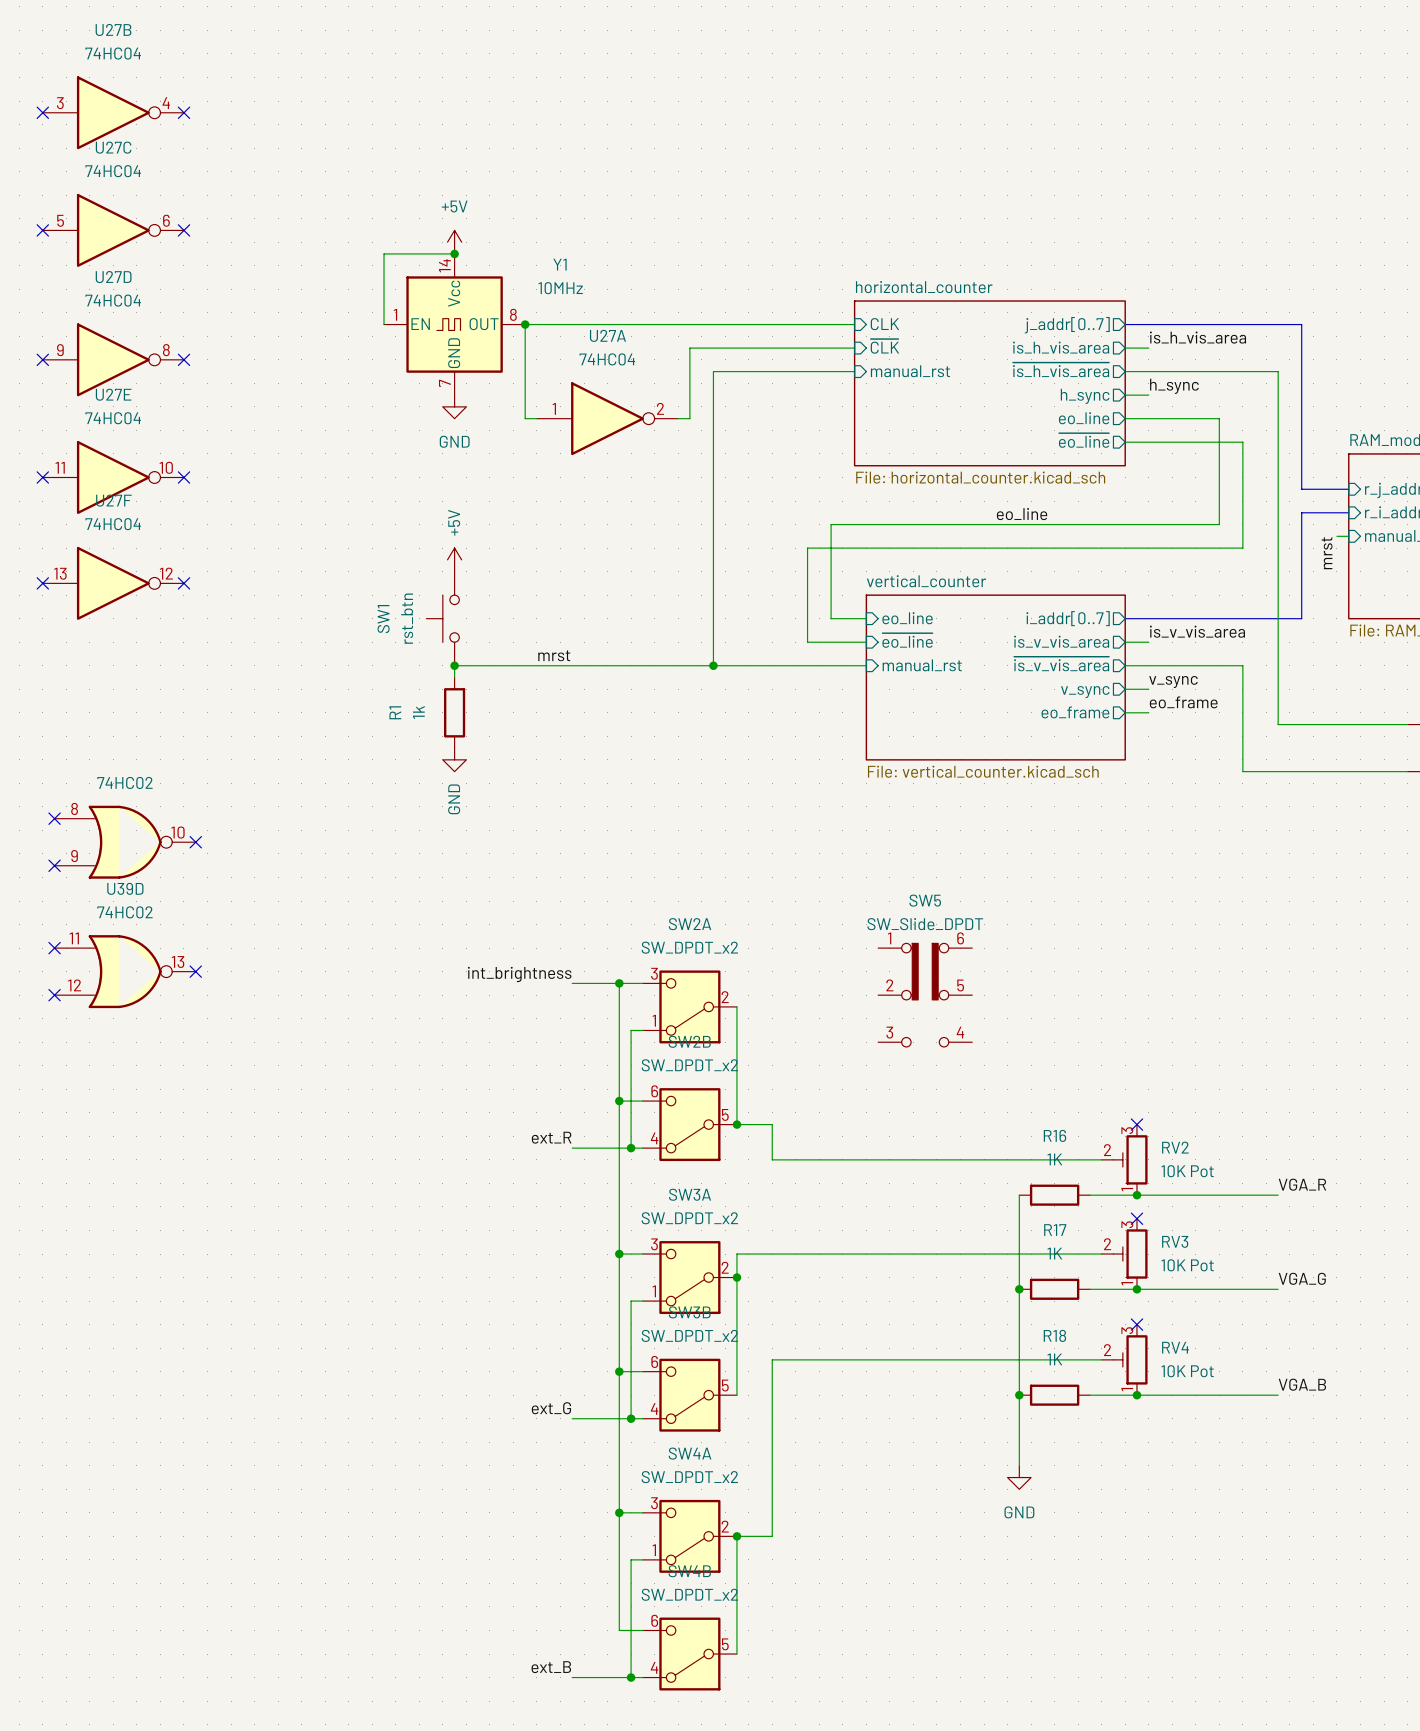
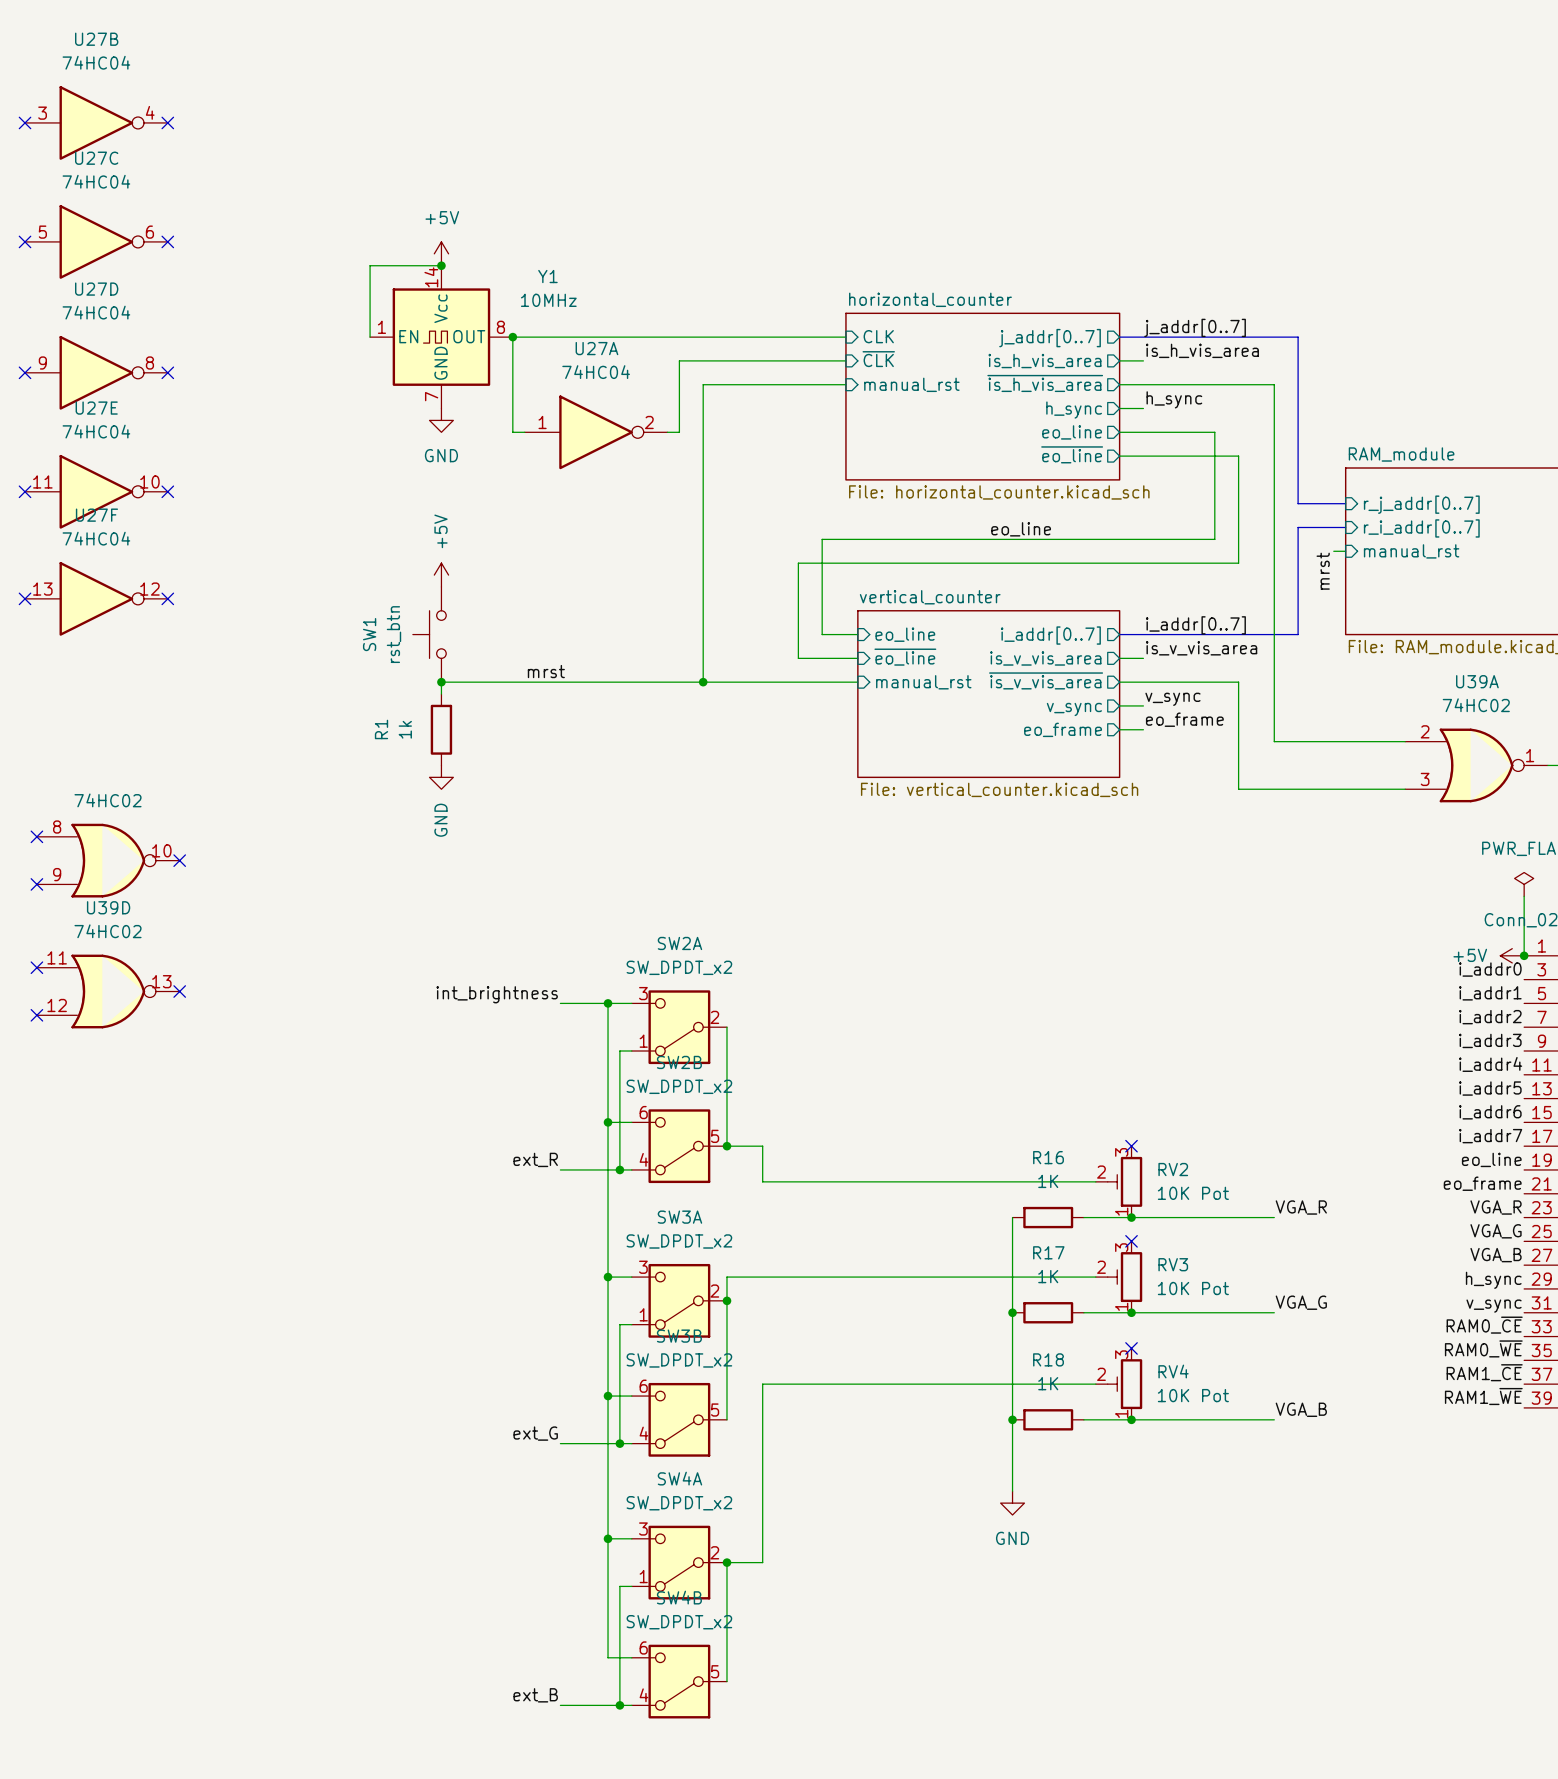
label: none -> j_addr[0..7] (1195, 327)
label: none -> i_addr[0..7] (1195, 625)
SW5: SW_Slide_DPDT (925, 995) -> none

